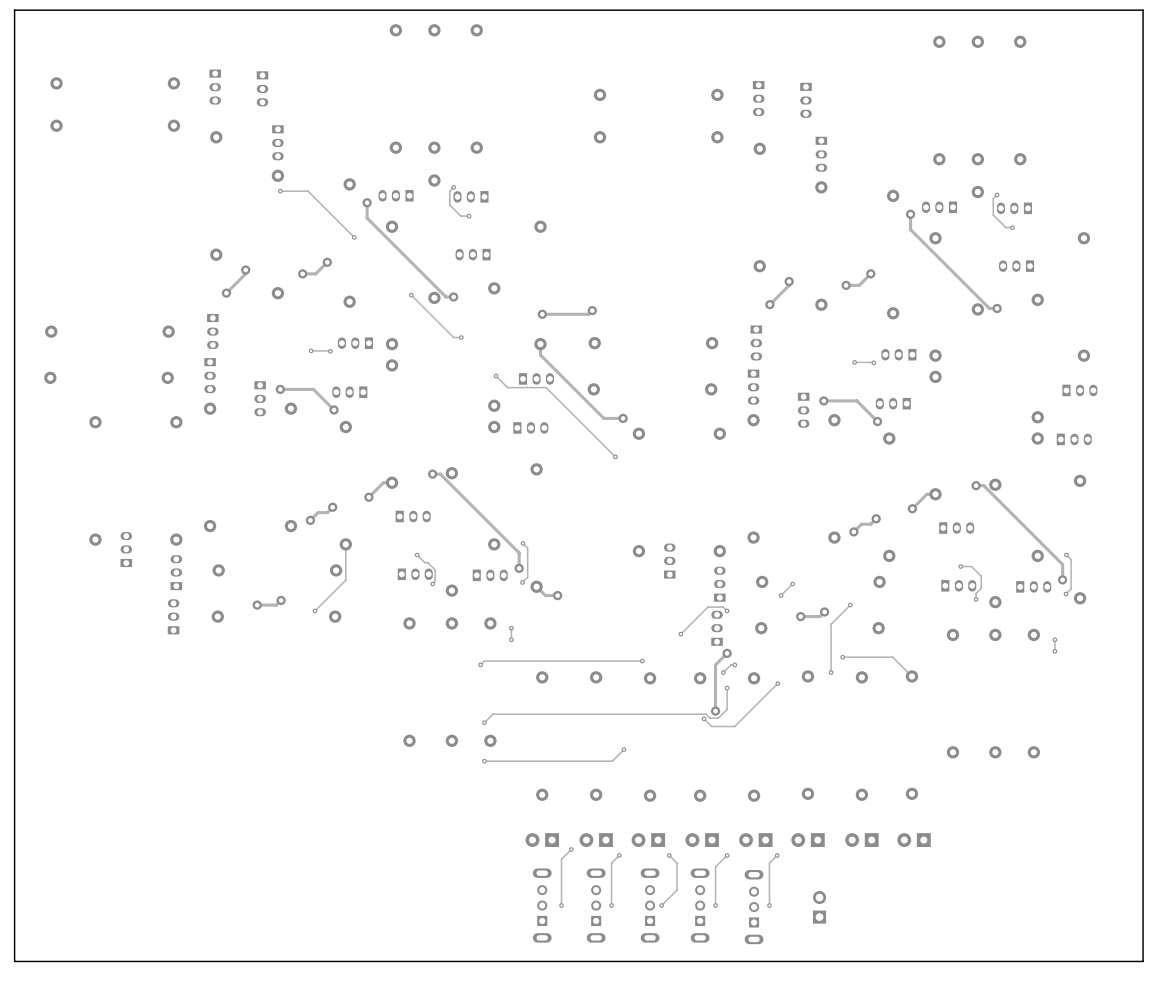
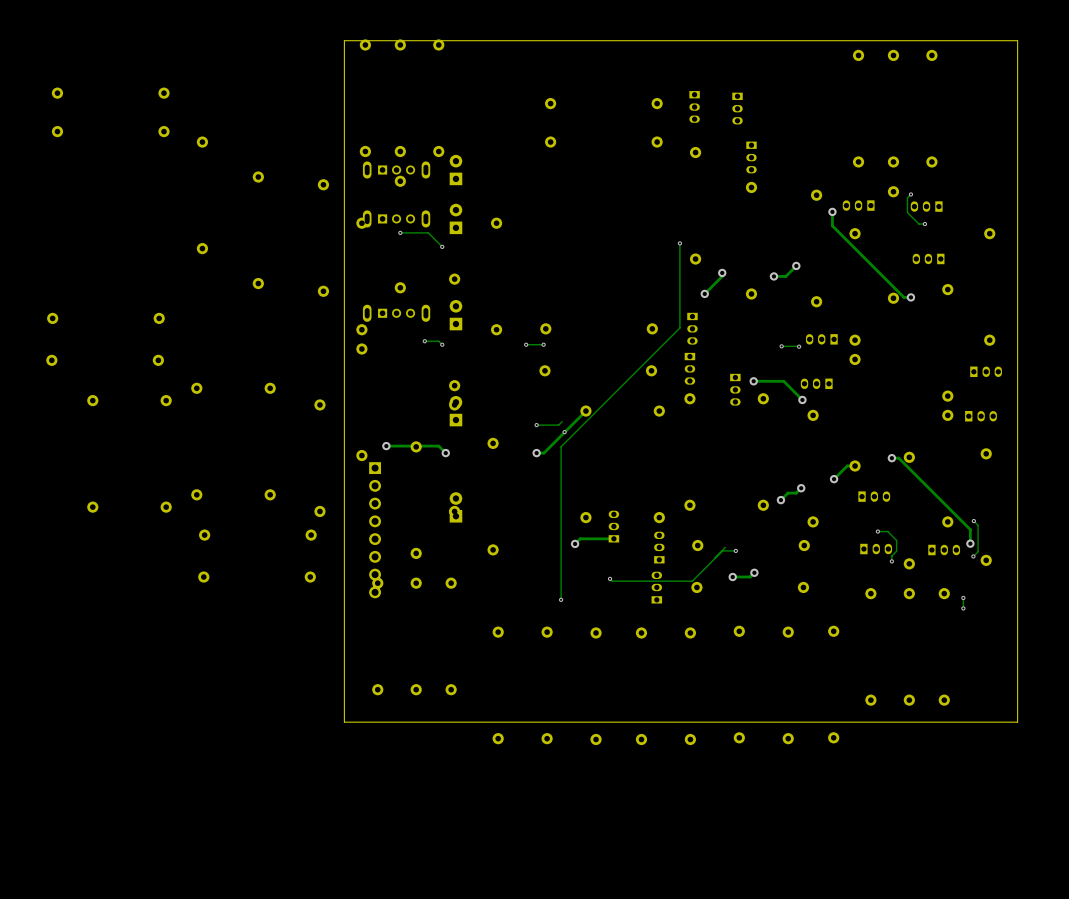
board edge: (1143, 10) (14, 10) (14, 961) (1143, 961) (1143, 10) -> (1017, 40) (1017, 722) (344, 722) (344, 40) (1017, 40)
part: (215, 87) -> none
part: (262, 88) -> none
part: (277, 142) -> none
part: none -> (396, 169)
part: none -> (455, 170)
track: (453, 187) (449, 191) (449, 205) (460, 216) (469, 216) -> none
via: (453, 187) -> none
track: (280, 191) (308, 191) (354, 237) -> none
via: (280, 191) -> none
part: (396, 195) -> none
part: (470, 196) -> none
track: (367, 202) (367, 218) (445, 296) (453, 296) -> none
via: (367, 202) -> none
via: (469, 216) -> none
part: none -> (396, 218)
part: none -> (455, 218)
via: (354, 237) -> none
track: none -> (400, 232) (428, 232) (442, 246)
via: none -> (400, 232)
track: none -> (679, 243) (679, 327) (561, 446) (561, 599)
via: none -> (679, 243)
via: none -> (442, 246)
part: (473, 254) -> none
track: (327, 262) (315, 273) (302, 273) -> none
via: (327, 262) -> none
track: (245, 270) (245, 273) (226, 293) -> none
via: (245, 270) -> none
via: (302, 273) -> none
via: (226, 293) -> none
track: (411, 295) (453, 337) (461, 337) -> none
via: (411, 295) -> none
via: (453, 296) -> none
track: (592, 310) (588, 314) (542, 314) -> none
via: (592, 310) -> none
via: (542, 314) -> none
part: none -> (396, 313)
part: none -> (455, 315)
part: (212, 331) -> none
via: (461, 337) -> none
part: (355, 343) -> none
track: (540, 344) (540, 355) (603, 418) (623, 418) -> none
track: (311, 350) (330, 351) -> none
via: (311, 350) -> none
via: (330, 351) -> none
track: none -> (424, 341) (438, 341) (442, 344)
via: none -> (424, 341)
via: none -> (442, 344)
via: none -> (526, 344)
track: none -> (543, 344) (526, 344)
via: none -> (543, 344)
part: (210, 375) -> none
track: (496, 376) (507, 387) (546, 387) (615, 456) -> none
via: (496, 376) -> none
part: (536, 378) -> none
track: (280, 389) (313, 389) (334, 410) -> none
via: (280, 389) -> none
part: (349, 392) -> none
part: (260, 398) -> none
via: (334, 410) -> none
via: (623, 418) -> none
part: (530, 427) -> none
part: none -> (455, 411)
track: none -> (585, 411) (543, 453) (536, 453)
track: none -> (562, 421) (558, 425) (536, 425)
via: none -> (536, 425)
track: none -> (386, 446) (438, 446) (445, 453)
track: (432, 474) (440, 474) (519, 552) (519, 568) -> none
via position: (432, 474) -> (386, 446)
via: none -> (445, 453)
via: none -> (536, 453)
track: (392, 482) (383, 482) (368, 497) -> none
via: (368, 497) -> none
track: (332, 507) (327, 512) (318, 512) (310, 520) -> none
via: (332, 507) -> none
part: (413, 516) -> none
via: (310, 520) -> none
part: none -> (455, 507)
track: (522, 543) (527, 548) (527, 577) (522, 582) -> none
via: (522, 543) -> none
track: (345, 544) (345, 580) (315, 610) -> none
part: (126, 549) -> none
track: (417, 555) (435, 569) (435, 581) (432, 584) -> none
via: (417, 555) -> none
part: none -> (375, 530)
via: (519, 568) -> none
part: (176, 572) -> none
part: (415, 574) -> none
track: none -> (613, 538) (580, 538) (575, 543)
part: (490, 575) -> none
via: none -> (575, 543)
via: (522, 582) -> none
via: (432, 584) -> none
via: (792, 584) -> none
track: (536, 586) (545, 595) (557, 595) -> none
track: none -> (735, 550) (722, 550) (692, 581) (612, 581) (610, 578)
via: none -> (735, 550)
via: (557, 595) -> none
via: (781, 595) -> none
track: (281, 600) (276, 605) (257, 605) -> none
via: (281, 600) -> none
via: (257, 605) -> none
track: (850, 605) (831, 624) (831, 672) -> none
via: (850, 605) -> none
via: (315, 610) -> none
track: (727, 610) (723, 607) (707, 607) (680, 634) -> none
via: (727, 610) -> none
part: (173, 616) -> none
track: (511, 628) (511, 639) -> none
via: (511, 628) -> none
via position: (680, 634) -> (610, 578)
via: (511, 639) -> none
via: none -> (561, 599)
track: (727, 653) (715, 664) (715, 711) -> none
via: (727, 653) -> none
track: (842, 657) (892, 657) (911, 676) -> none
via: (842, 657) -> none
track: (642, 661) (484, 661) (480, 664) -> none
via: (642, 661) -> none
via: (480, 664) -> none
track: (734, 664) (730, 664) (723, 672) -> none
via: (734, 664) -> none
via: (723, 672) -> none
via: (831, 672) -> none
track: (777, 683) (734, 726) (711, 726) (703, 718) -> none
via: (777, 683) -> none
track: (727, 688) (727, 709) (718, 718) (709, 718) (705, 714) (492, 714) (484, 722) -> none
via: (727, 688) -> none
via: (715, 711) -> none
via: (703, 718) -> none
via: (484, 722) -> none
track: (623, 749) (612, 761) (484, 761) -> none
via: (623, 749) -> none
via: (484, 761) -> none
part: (542, 840) -> none
part: (596, 840) -> none
part: (648, 840) -> none
part: (702, 840) -> none
part: (755, 840) -> none
part: (808, 840) -> none
part: (861, 840) -> none
part: (914, 840) -> none
track: (571, 849) (561, 859) (561, 905) -> none
via: (571, 849) -> none
track: (619, 855) (611, 863) (611, 905) -> none
via: (619, 855) -> none
track: (669, 855) (677, 863) (677, 890) (661, 905) -> none
via: (669, 855) -> none
track: (727, 855) (715, 867) (715, 905) -> none
via: (727, 855) -> none
track: (777, 855) (769, 863) (769, 905) -> none
via: (777, 855) -> none
part: (542, 905) -> none
via: (561, 905) -> none
part: (596, 905) -> none
via: (611, 905) -> none
part: (650, 905) -> none
via: (661, 905) -> none
part: (700, 905) -> none
via: (715, 905) -> none
via: (769, 905) -> none
part: (754, 907) -> none
part: (819, 907) -> none

